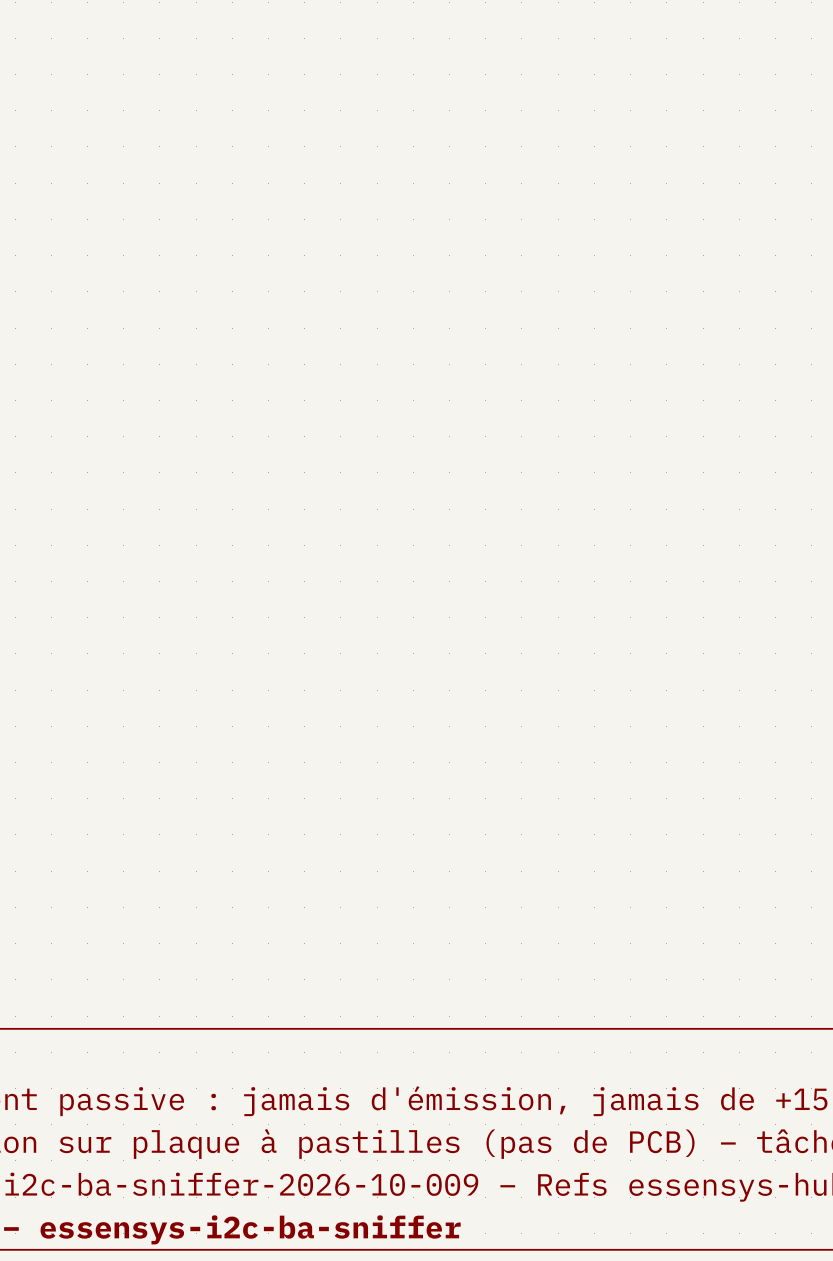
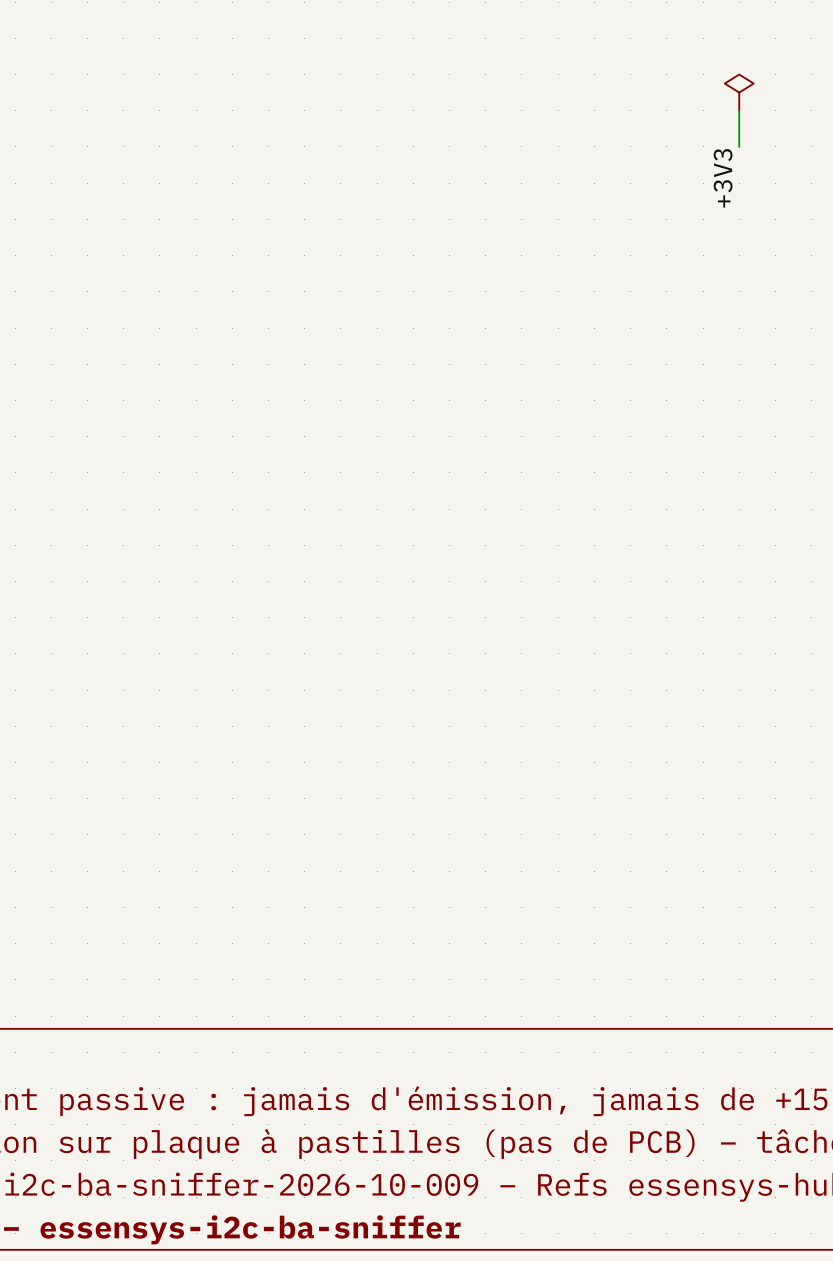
power symbol: none -> (739, 92)
wire: none -> (739, 110) (739, 146)
label: none -> +3V3 (723, 178)

